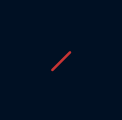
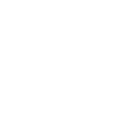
top track: (70, 52) (52, 70) -> none

